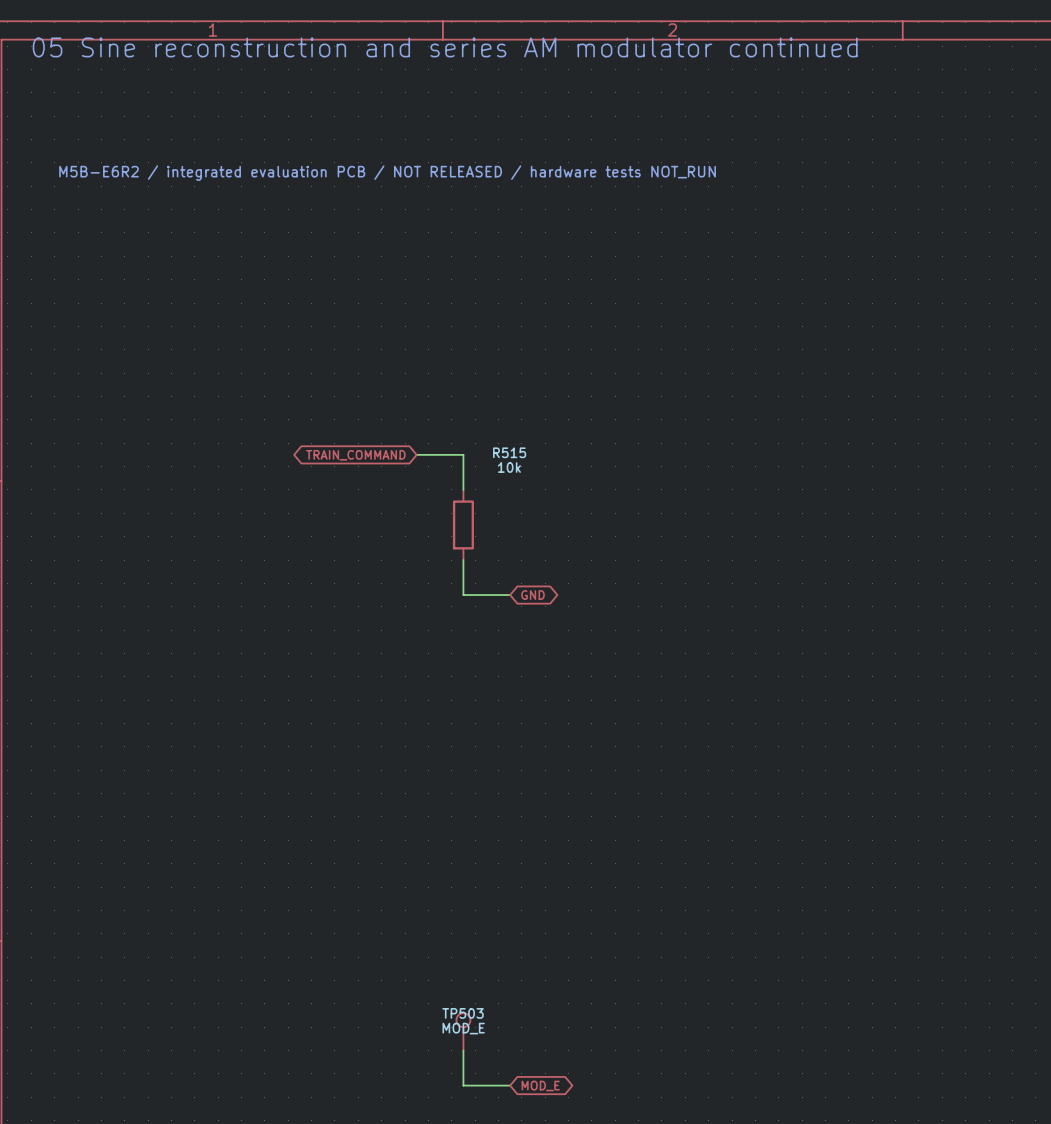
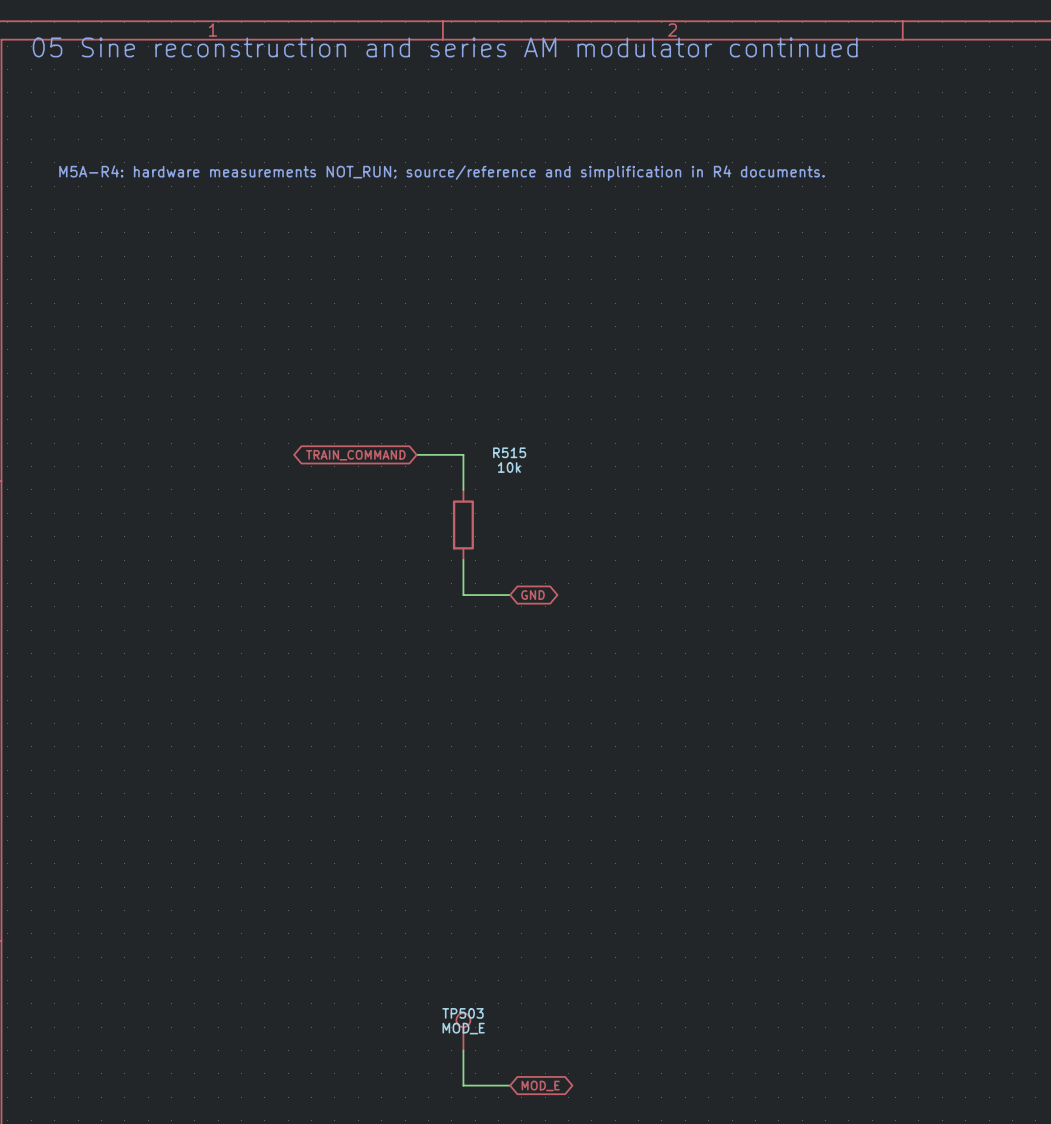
text: M5B-E6R2 / integrated evaluation PCB / NOT RELEASED / hardware tests NOT_RUN (387, 173) -> M5A-R4: hardware measurements NOT_RUN; source/reference and simplification in R4 documents. (442, 173)

